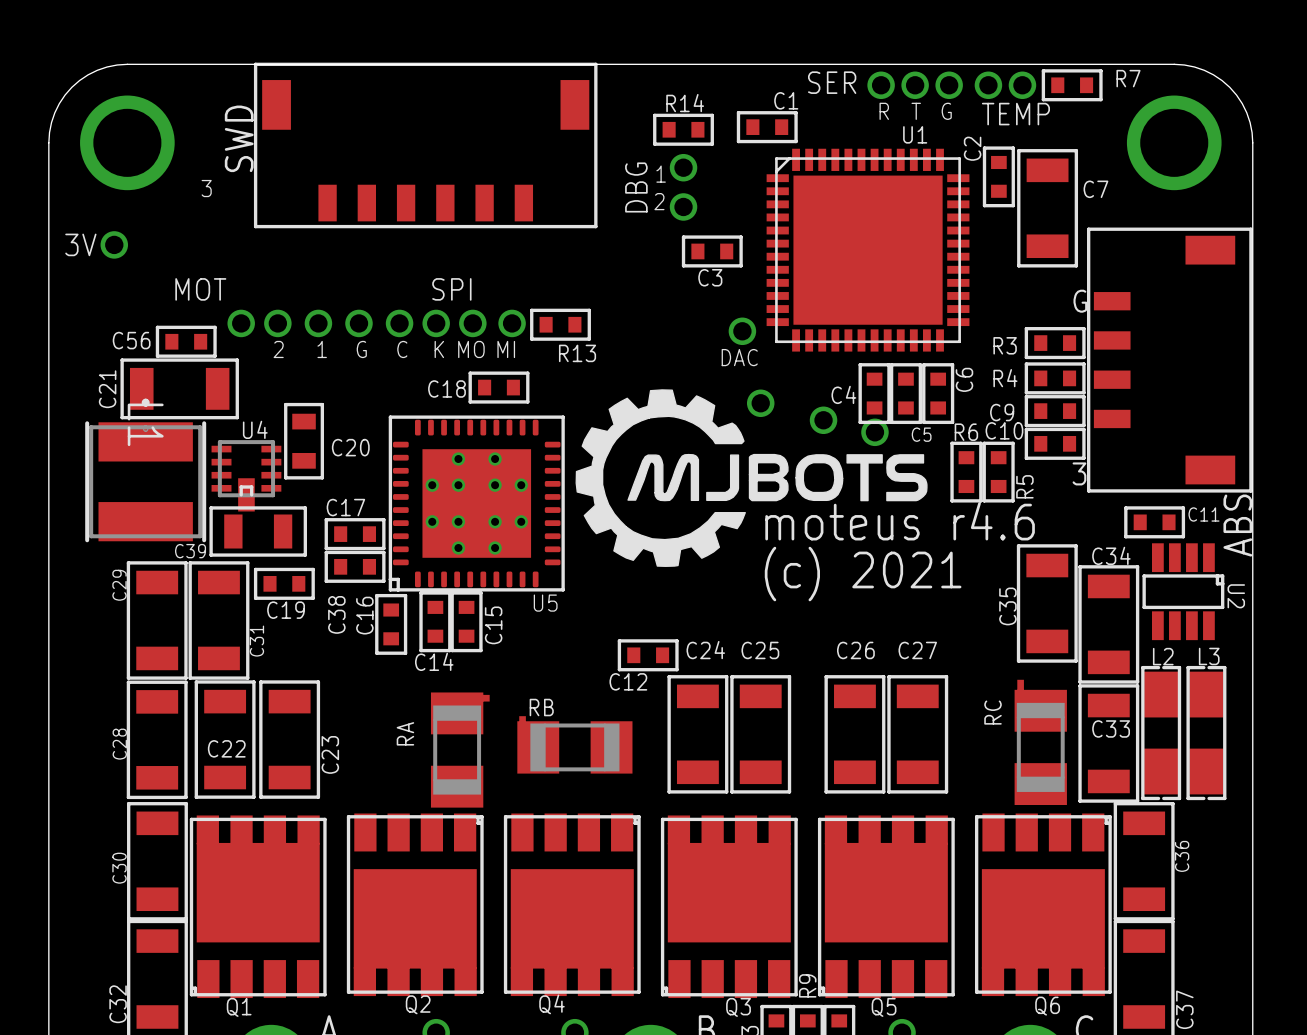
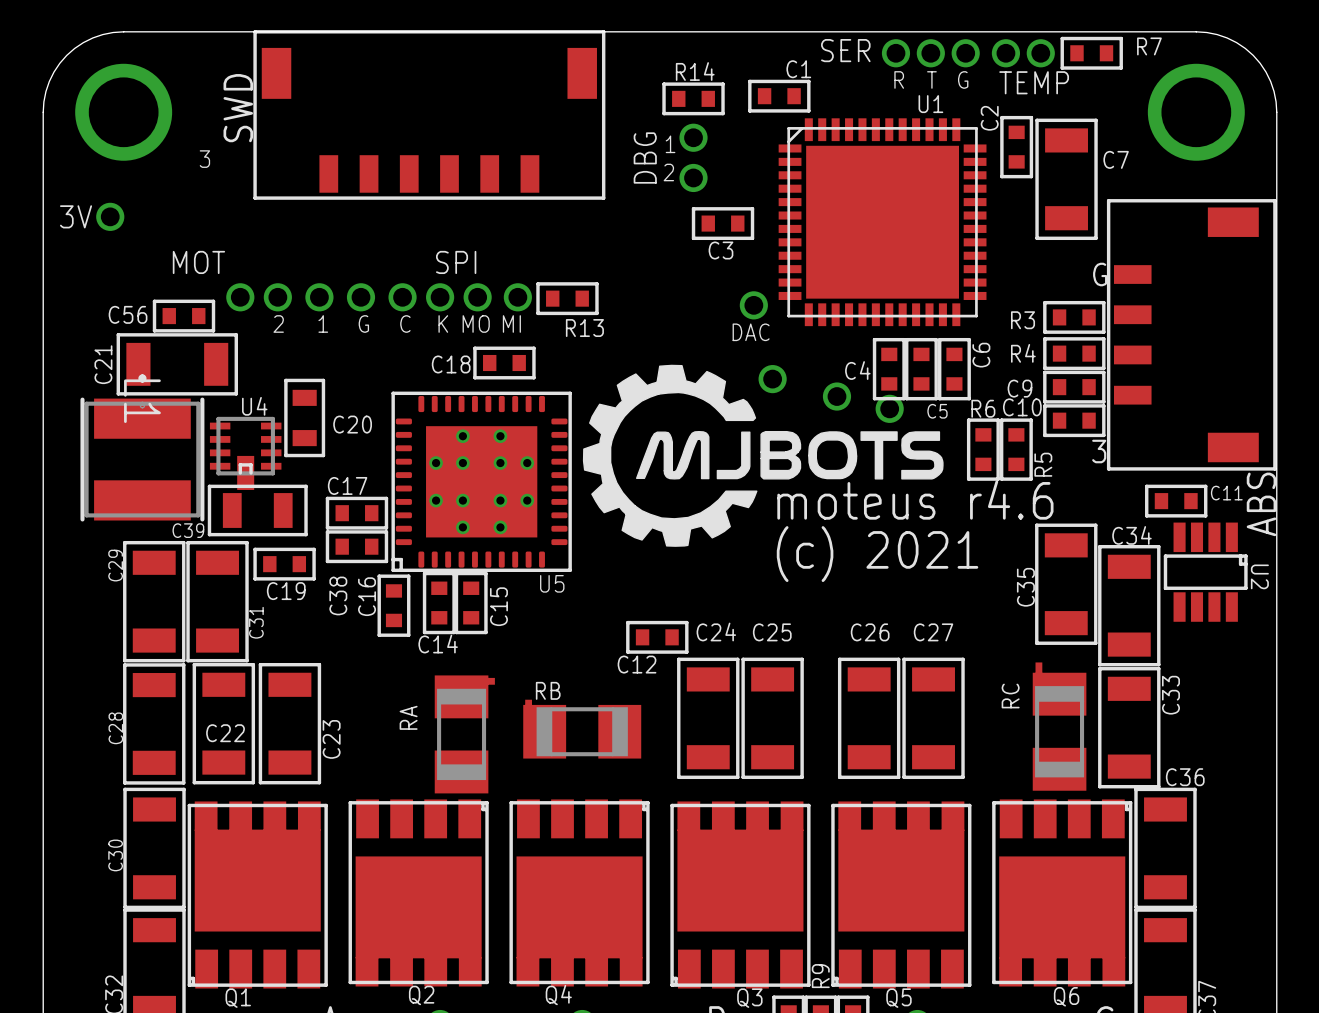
C33 name rotation: 0° (1111, 728) -> 90° counterclockwise (1170, 695)
L2: (1161, 733) -> none
L3: (1206, 733) -> none
C36 name rotation: 0° (1182, 856) -> 90° clockwise (1185, 777)
C36 name position: C36 (1182, 856) -> C36 (1185, 777)

